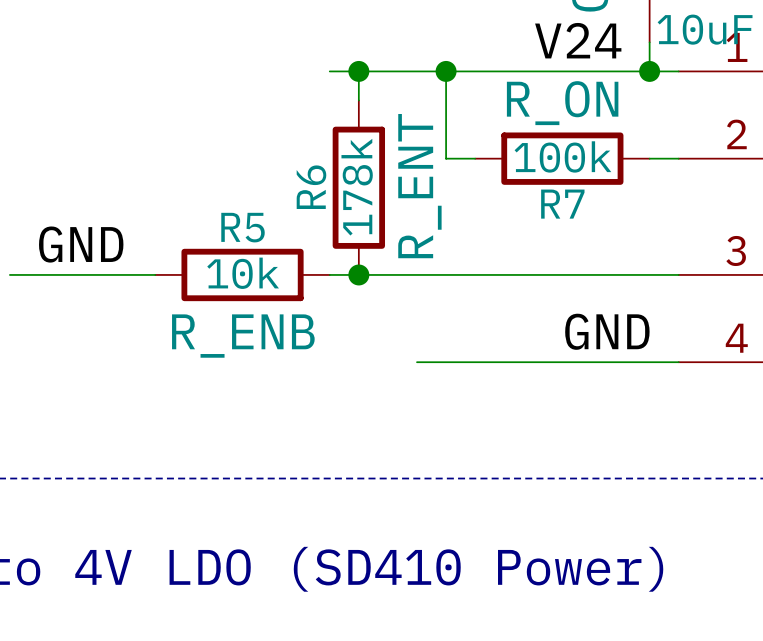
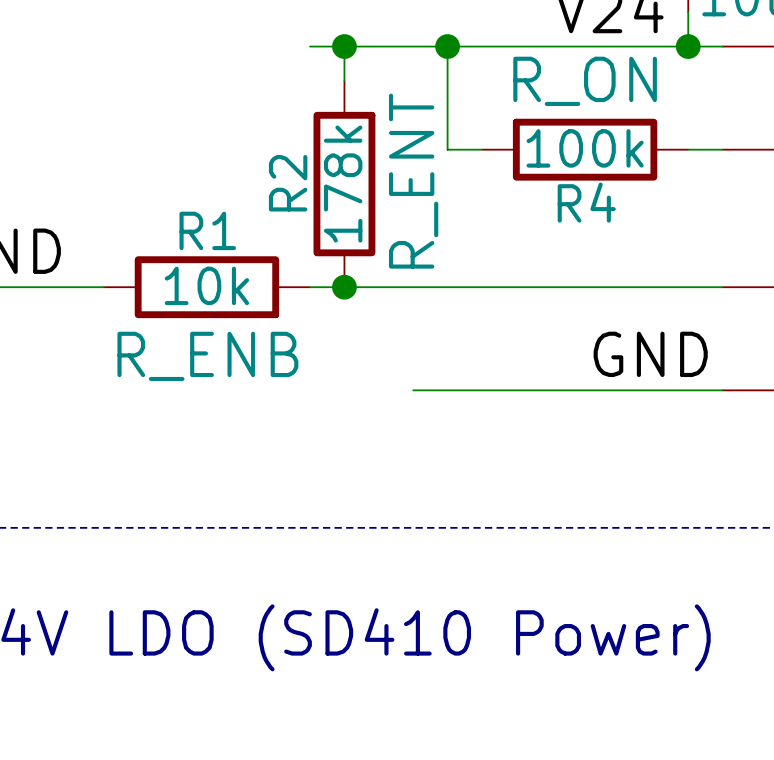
R6 name: R6 (311, 187) -> R2 (288, 183)
R7 name: R7 (562, 204) -> R4 (586, 202)
R5 name: R5 (243, 227) -> R1 (207, 230)

